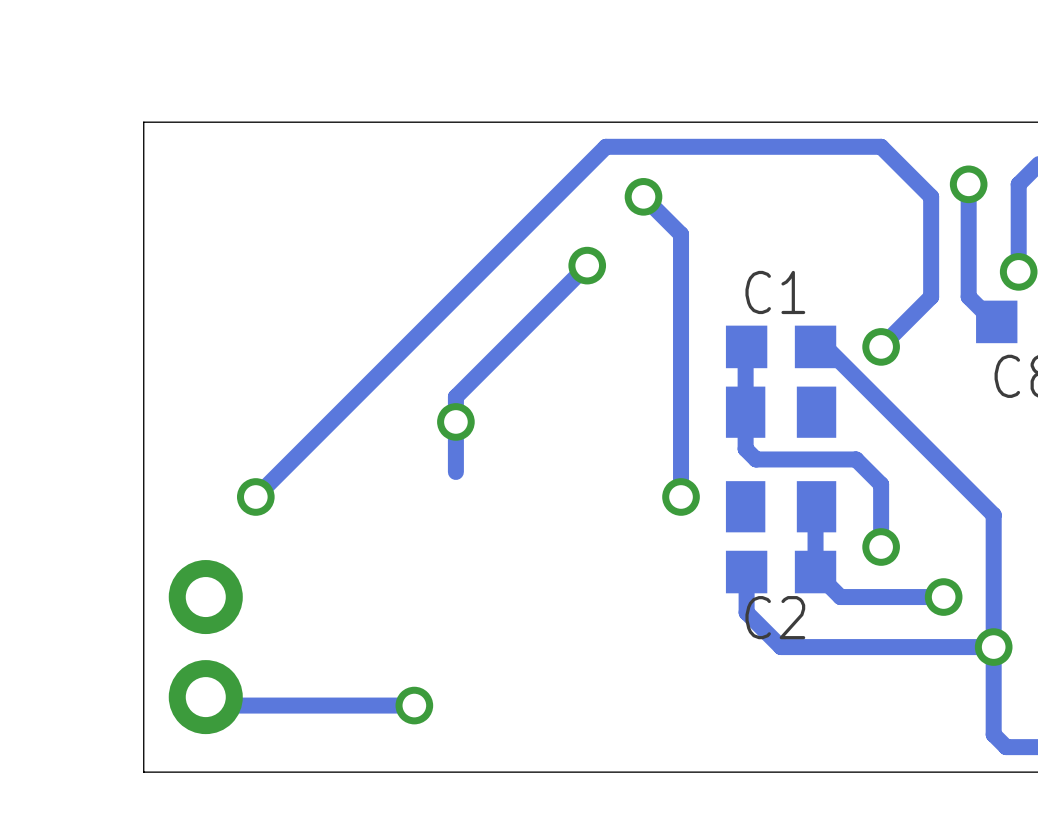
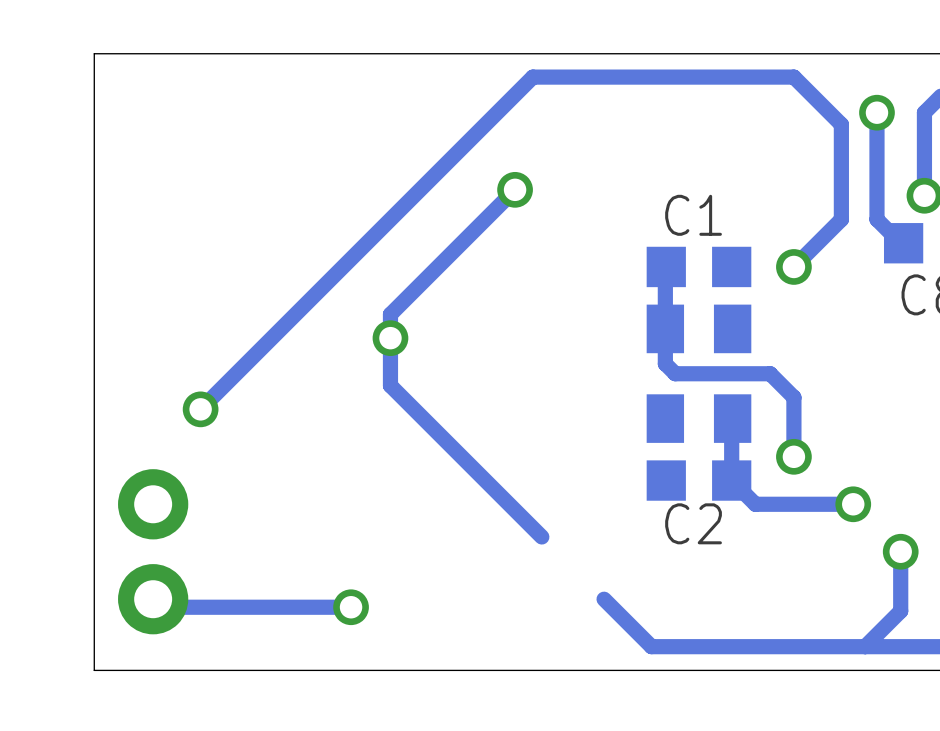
track: (643, 196) (681, 234) (681, 496) -> none
via: (643, 196) -> none
track: (815, 346) (825, 346) (993, 515) (993, 647) (781, 647) (746, 612) (746, 572) -> none
track: none -> (390, 385) (541, 536)
via: (681, 496) -> none
track: none -> (604, 599) (651, 646) (912, 646)
track: (993, 709) (993, 734) (1006, 747) -> (900, 611) (865, 646)

